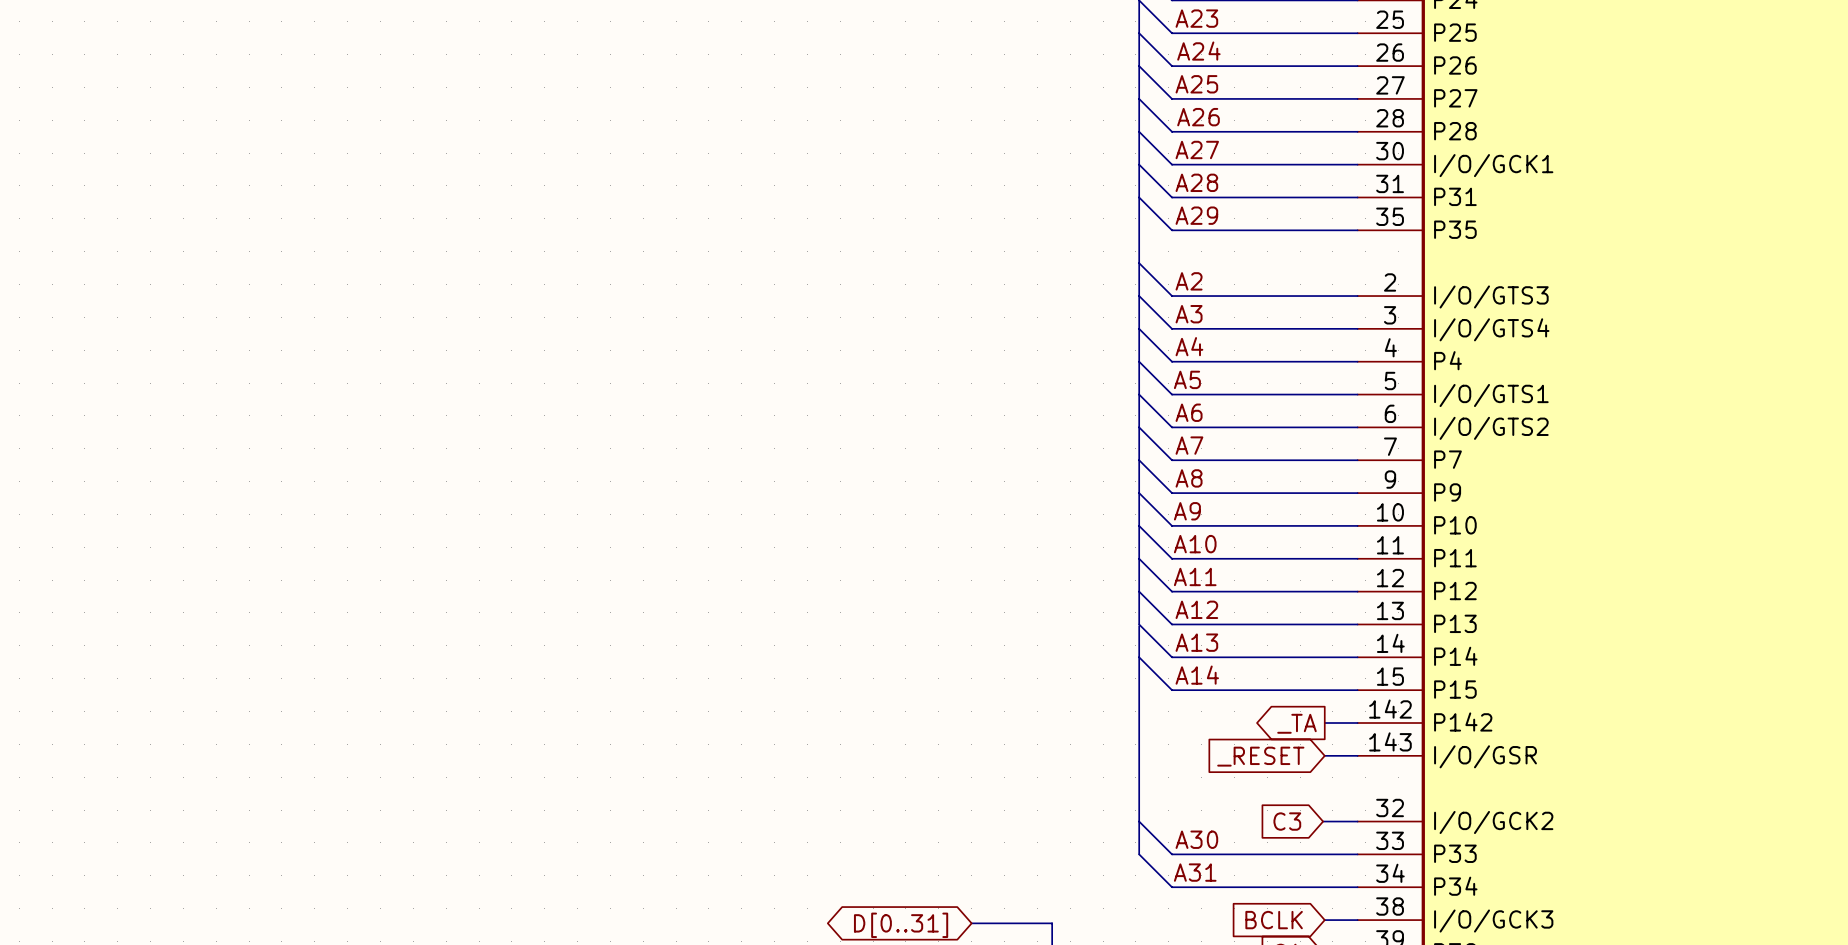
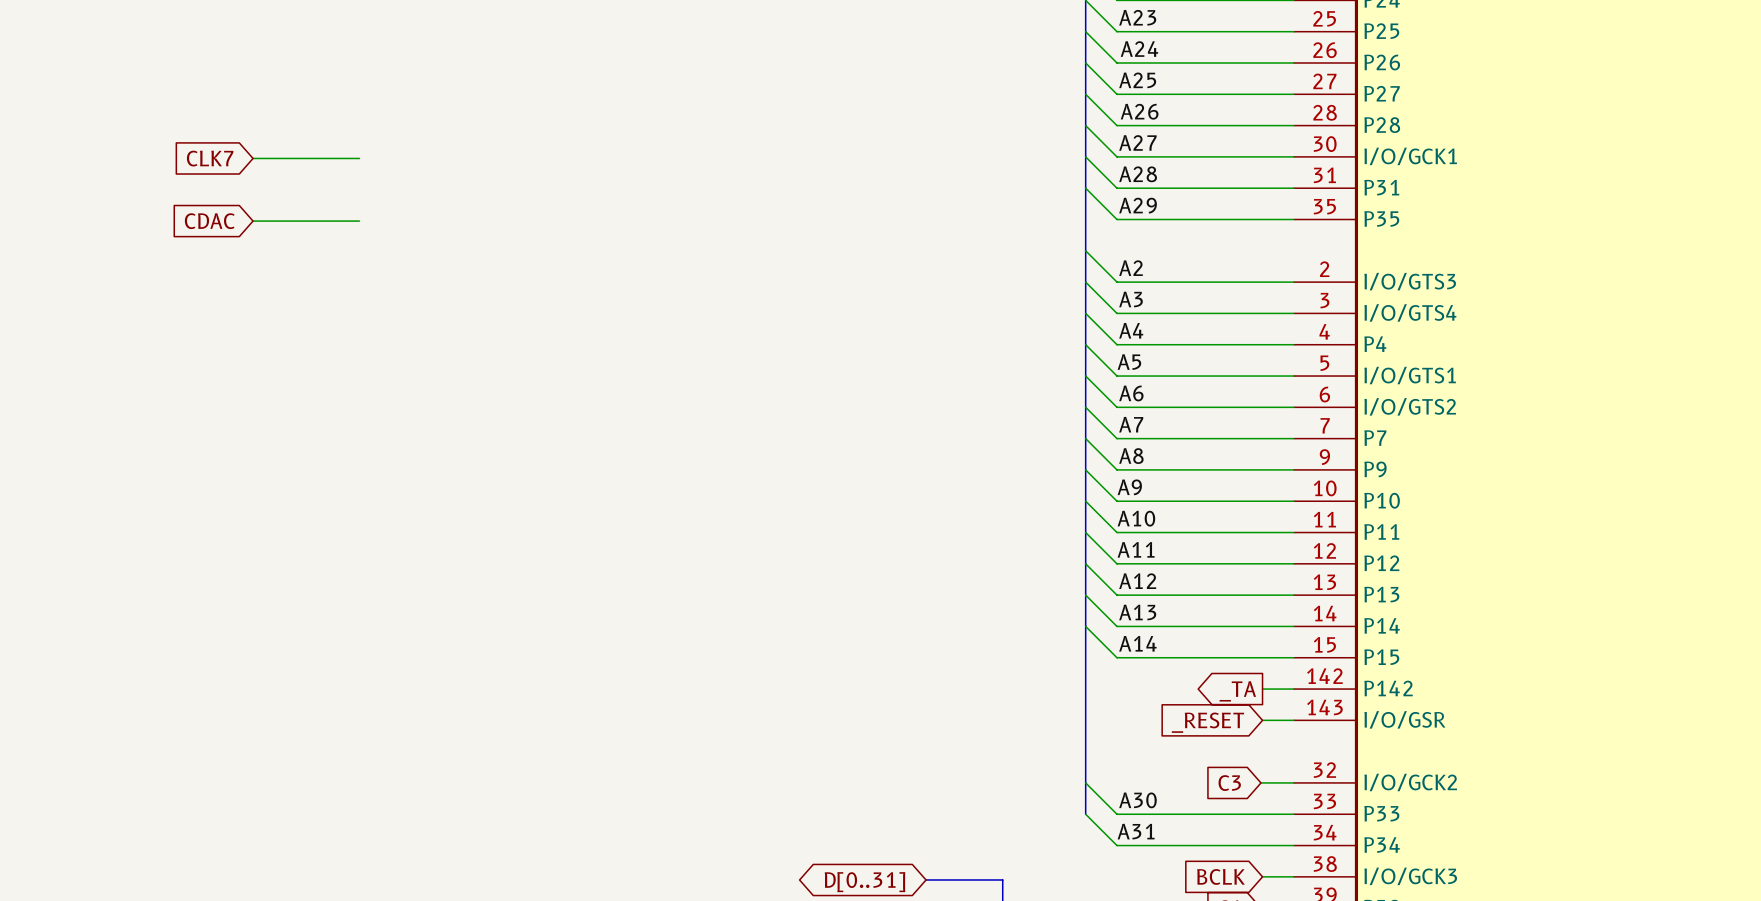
global label: none -> CLK7 (210, 158)
wire: none -> (253, 158) (359, 158)
global label: none -> CDAC (209, 221)
wire: none -> (253, 221) (359, 221)

